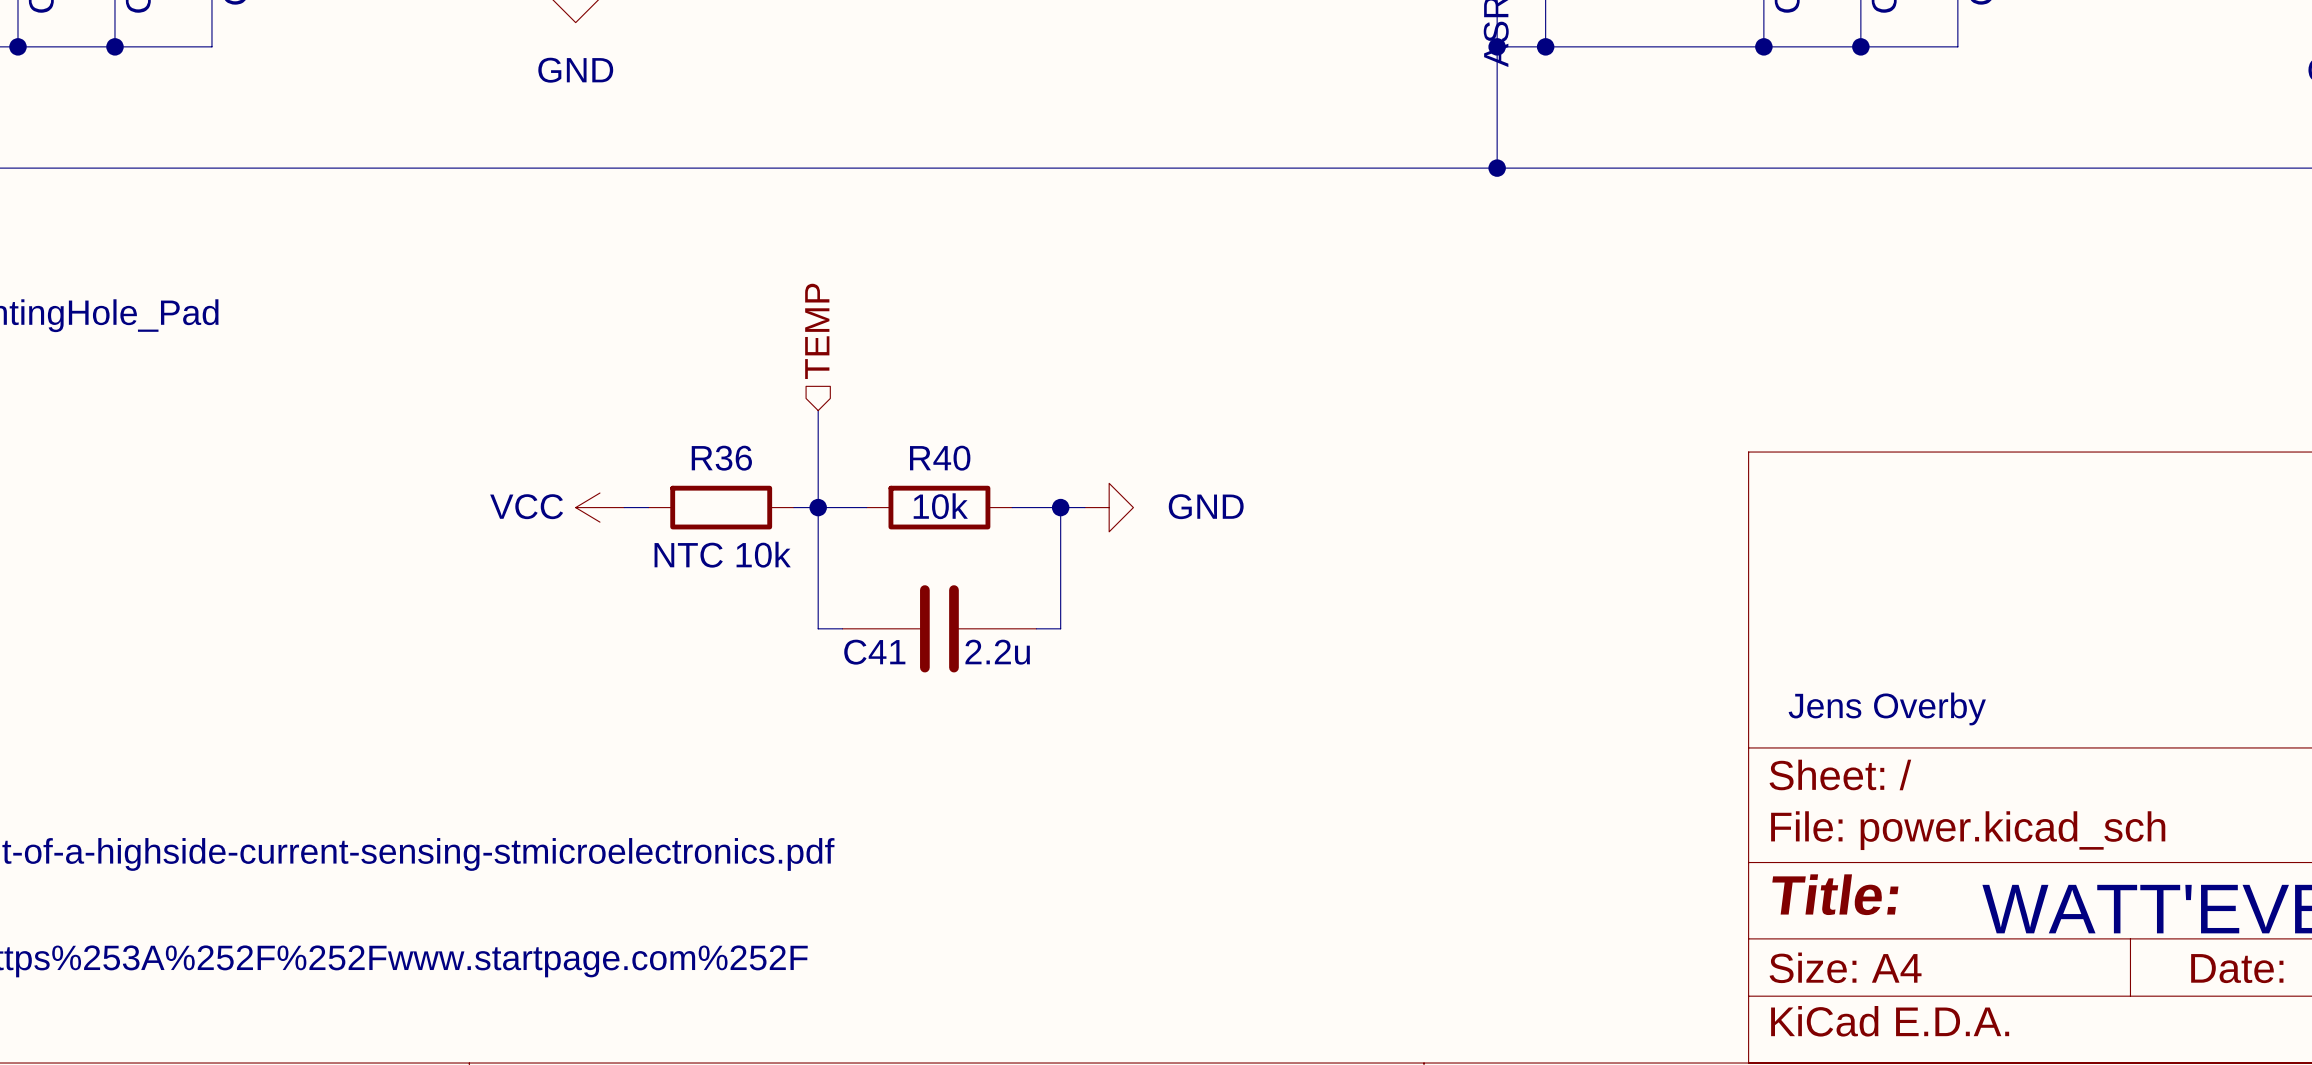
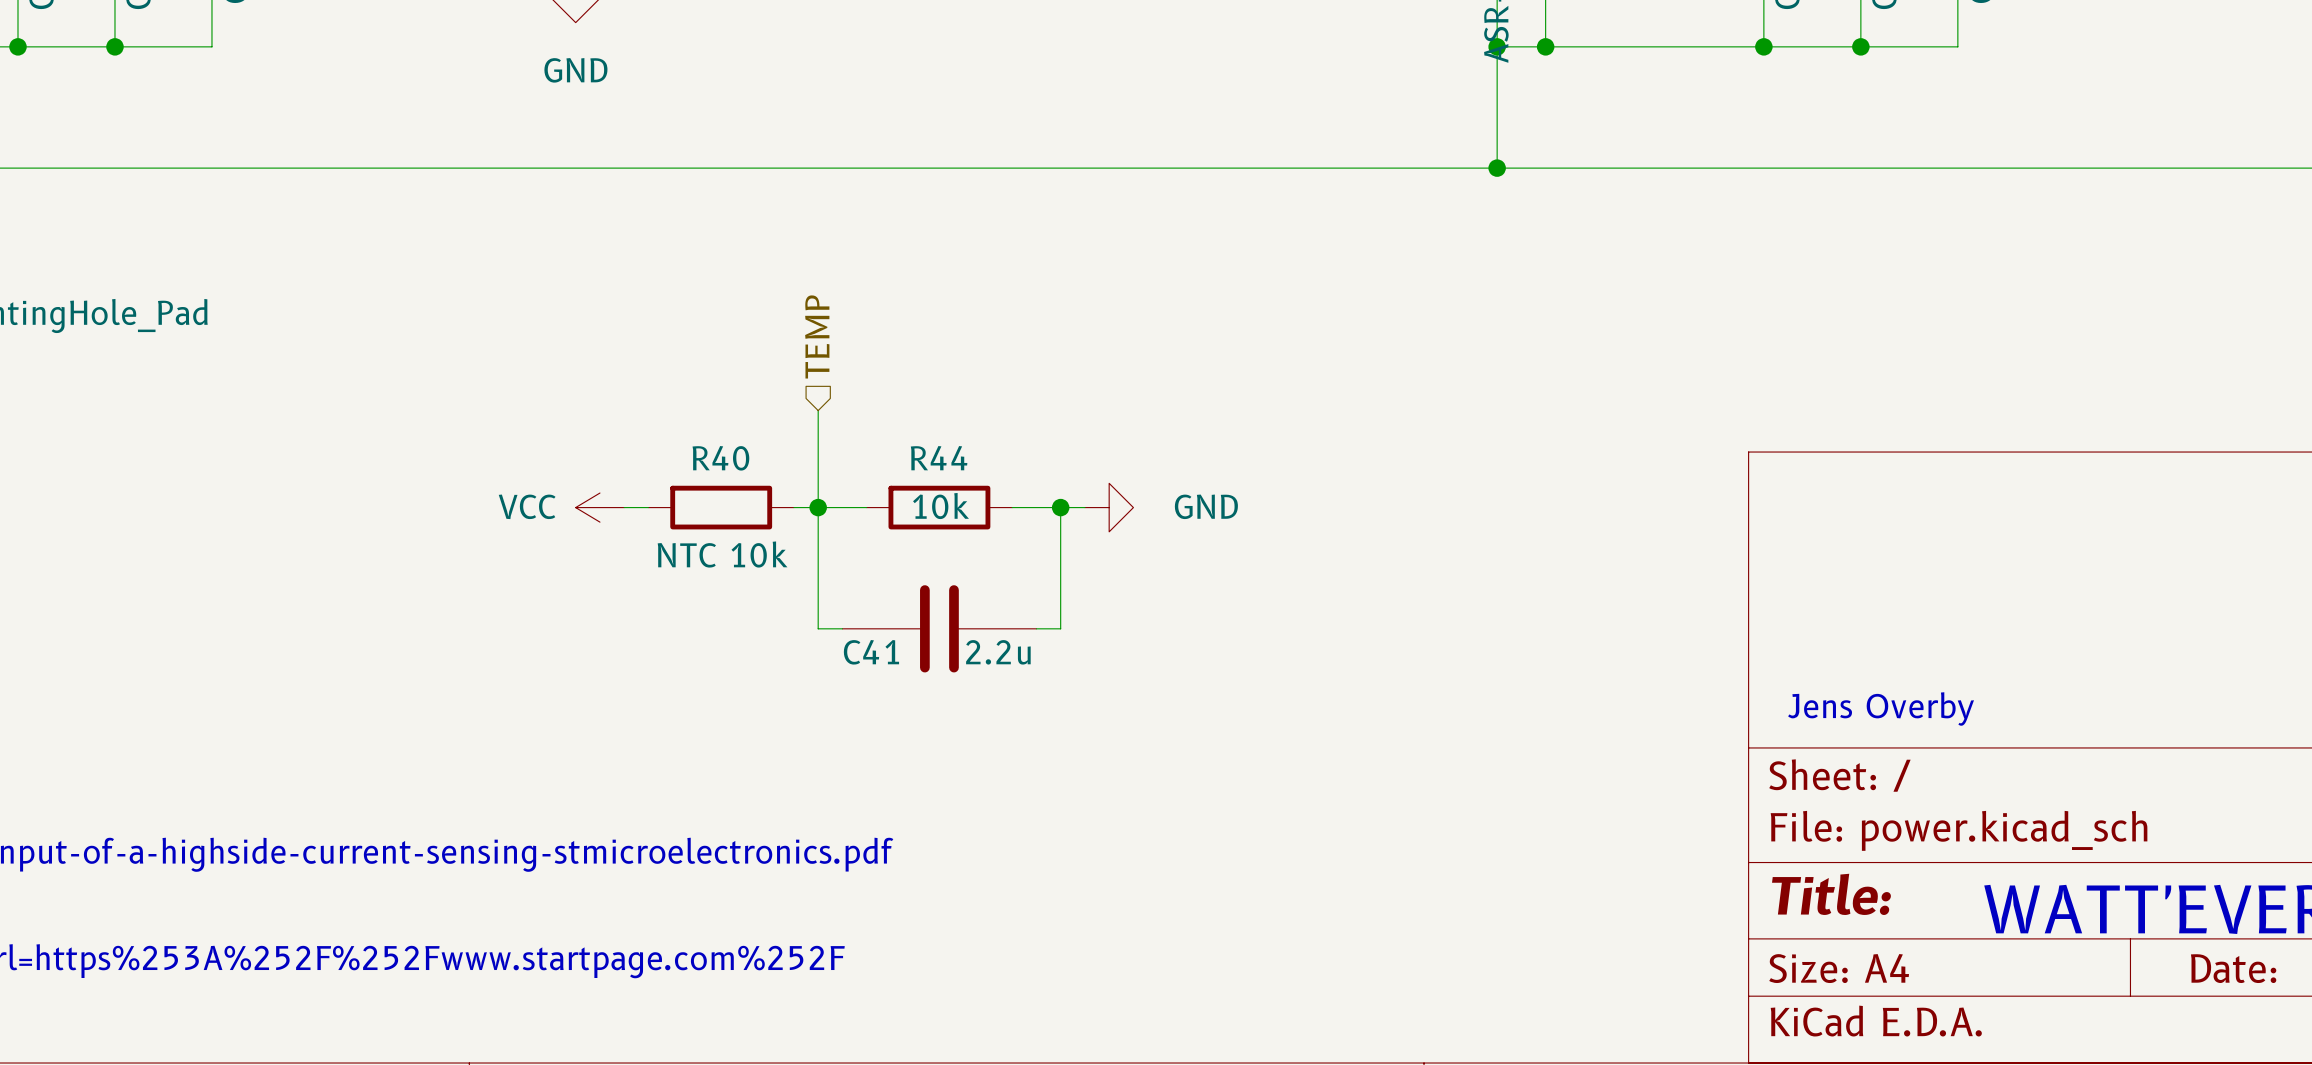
R36 name: R36 (721, 458) -> R40 (720, 458)
R40 name: R40 (940, 458) -> R44 (939, 458)

